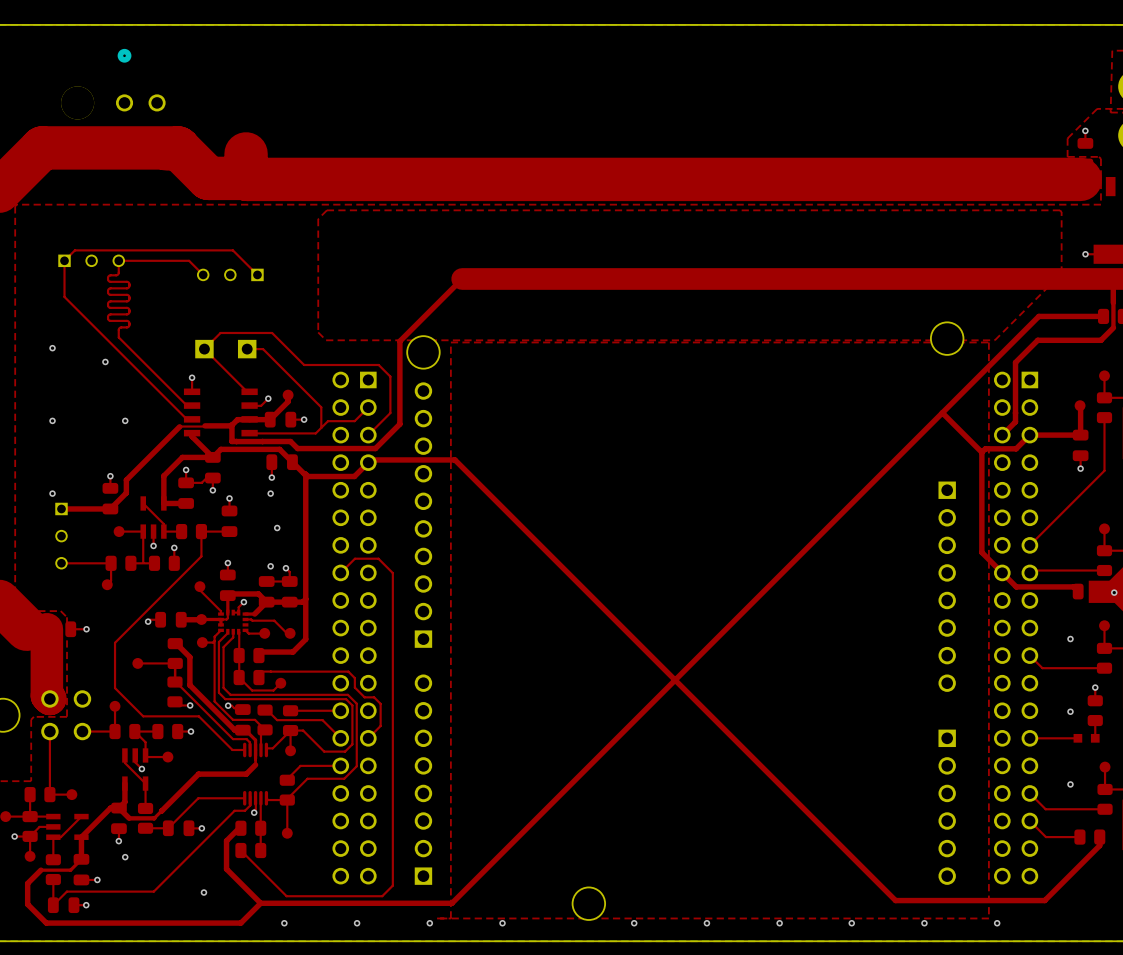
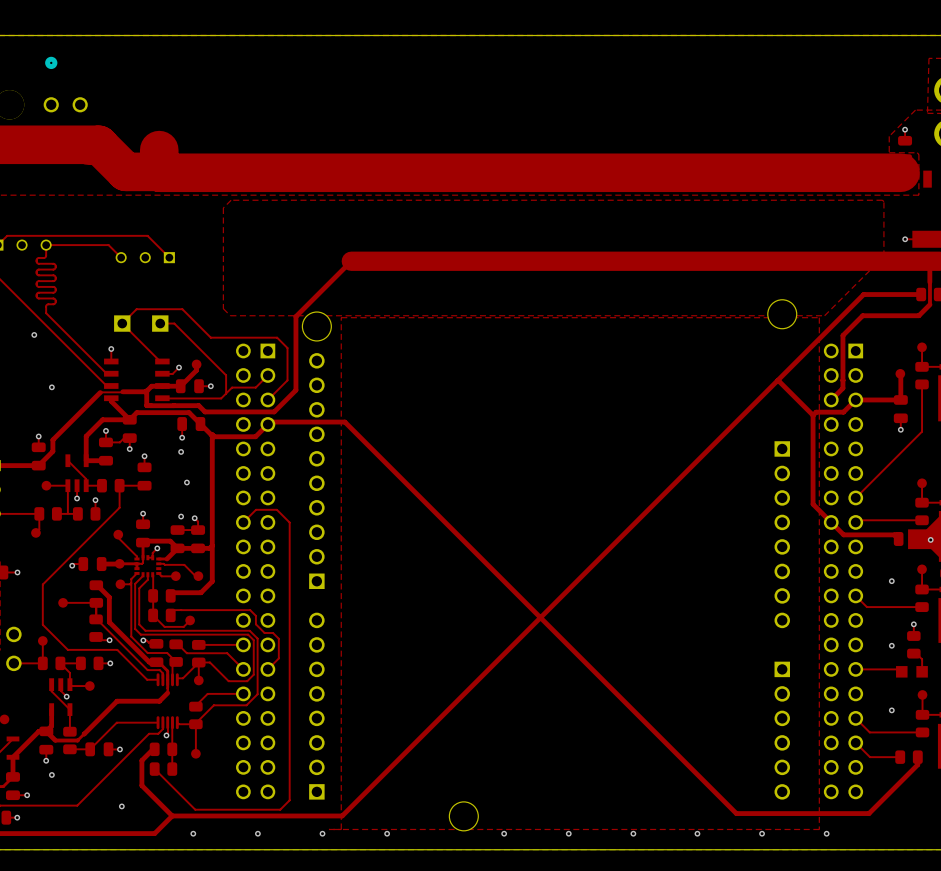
top track: (1095, 720) (1095, 738) -> none
top track: none -> (917, 654) (922, 659) (922, 671)
part footprint: [1073, 733, 1100, 743] -> [896, 666, 928, 678]

